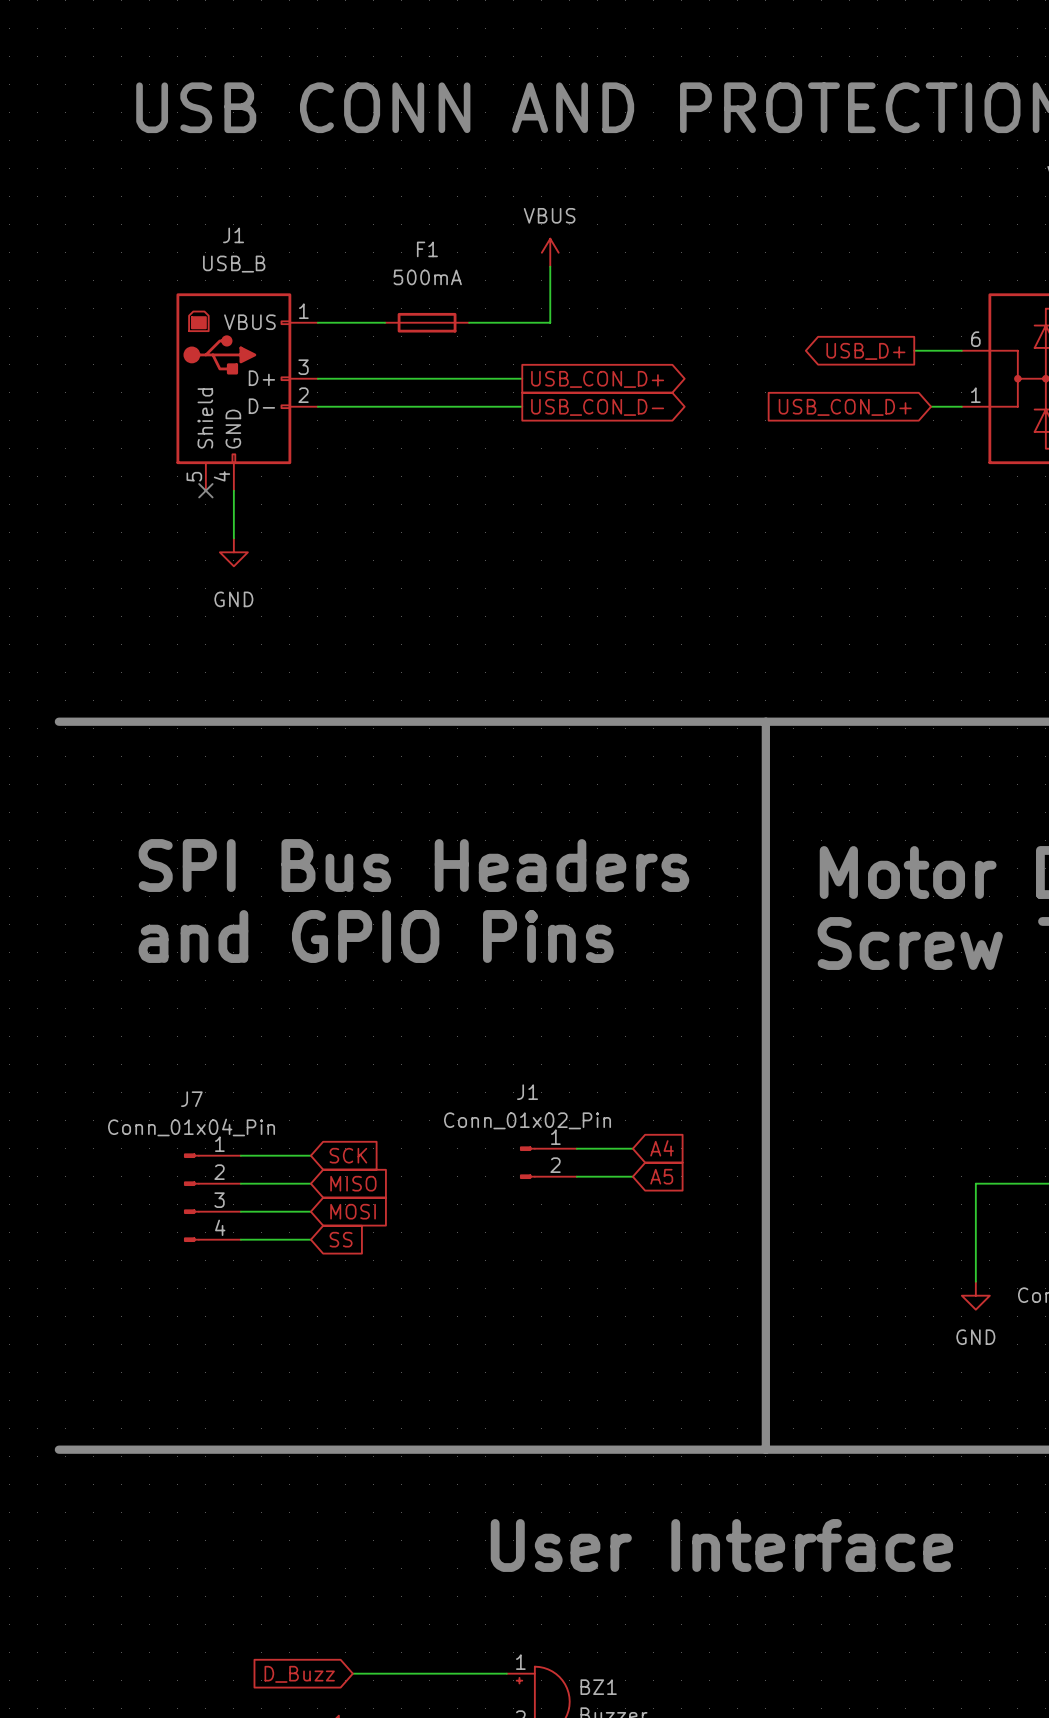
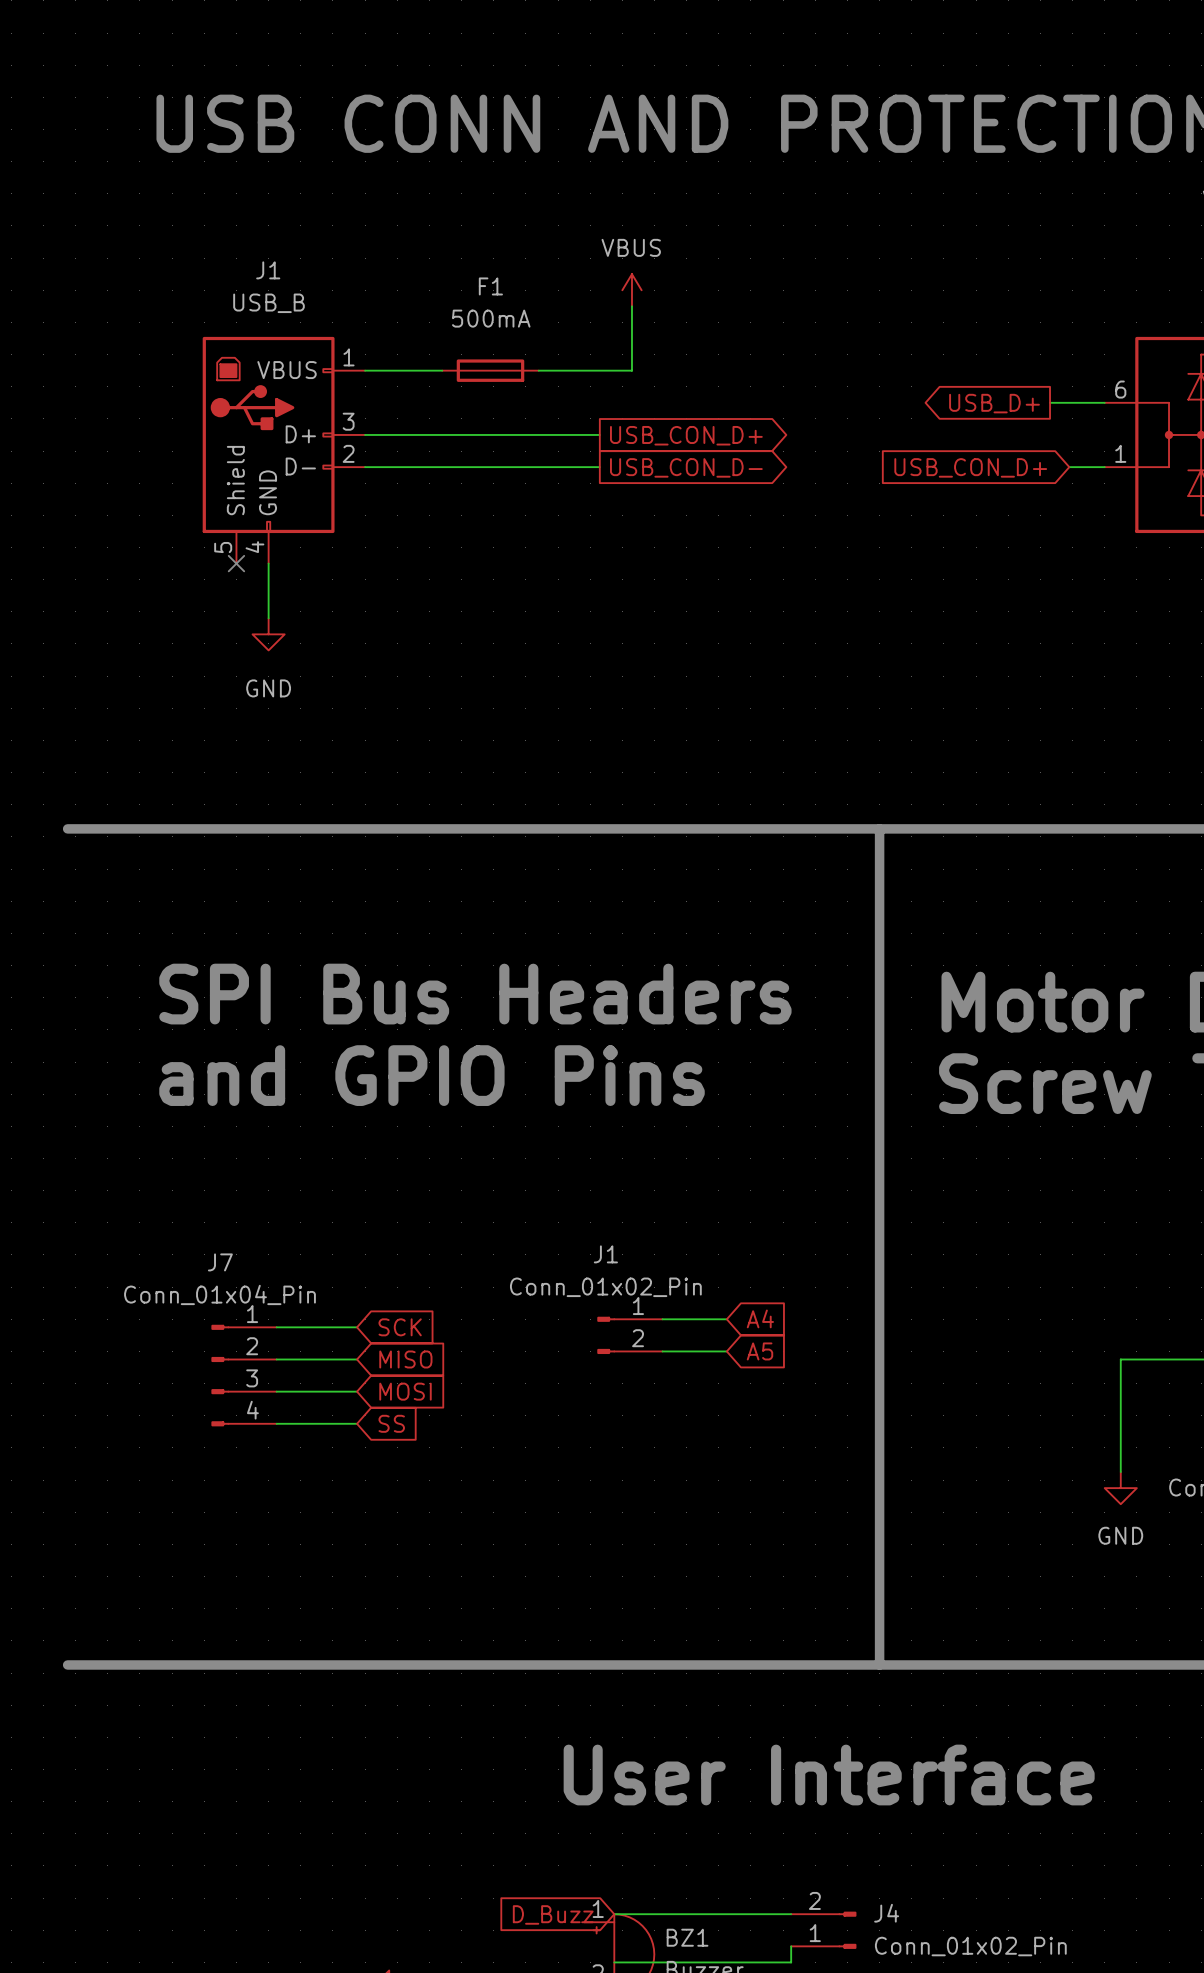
wire: (352, 1673) (506, 1673) -> (614, 1914) (791, 1914)
global label position: D_Buzz (299, 1674) -> D_Buzz (553, 1914)
J4: none -> Conn_01x02_Pin (823, 1930)
wire: none -> (791, 1946) (791, 1962) (614, 1962)

